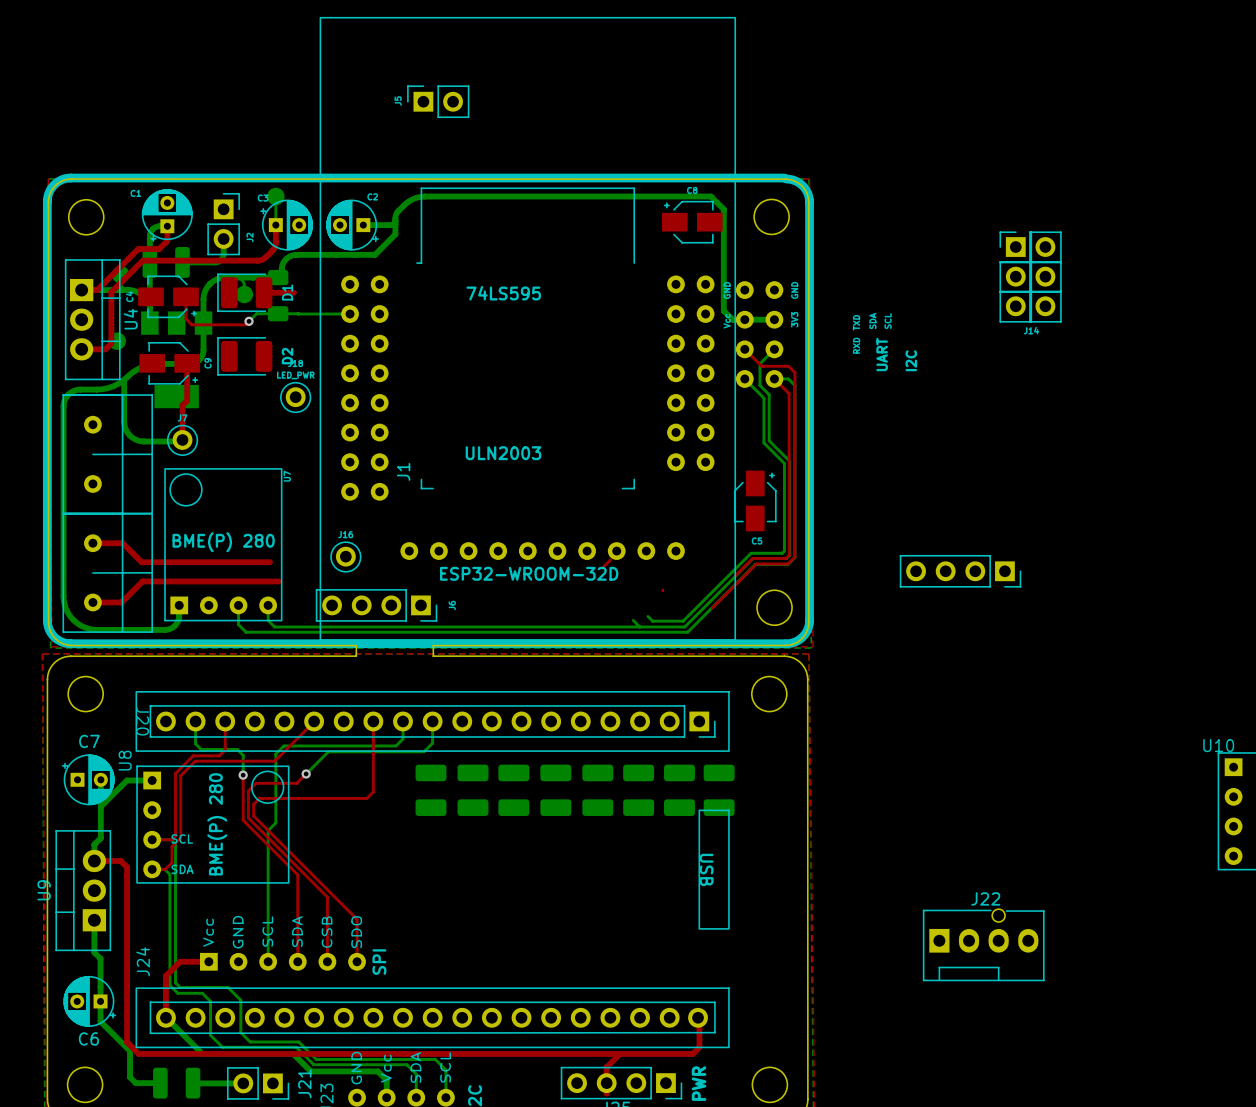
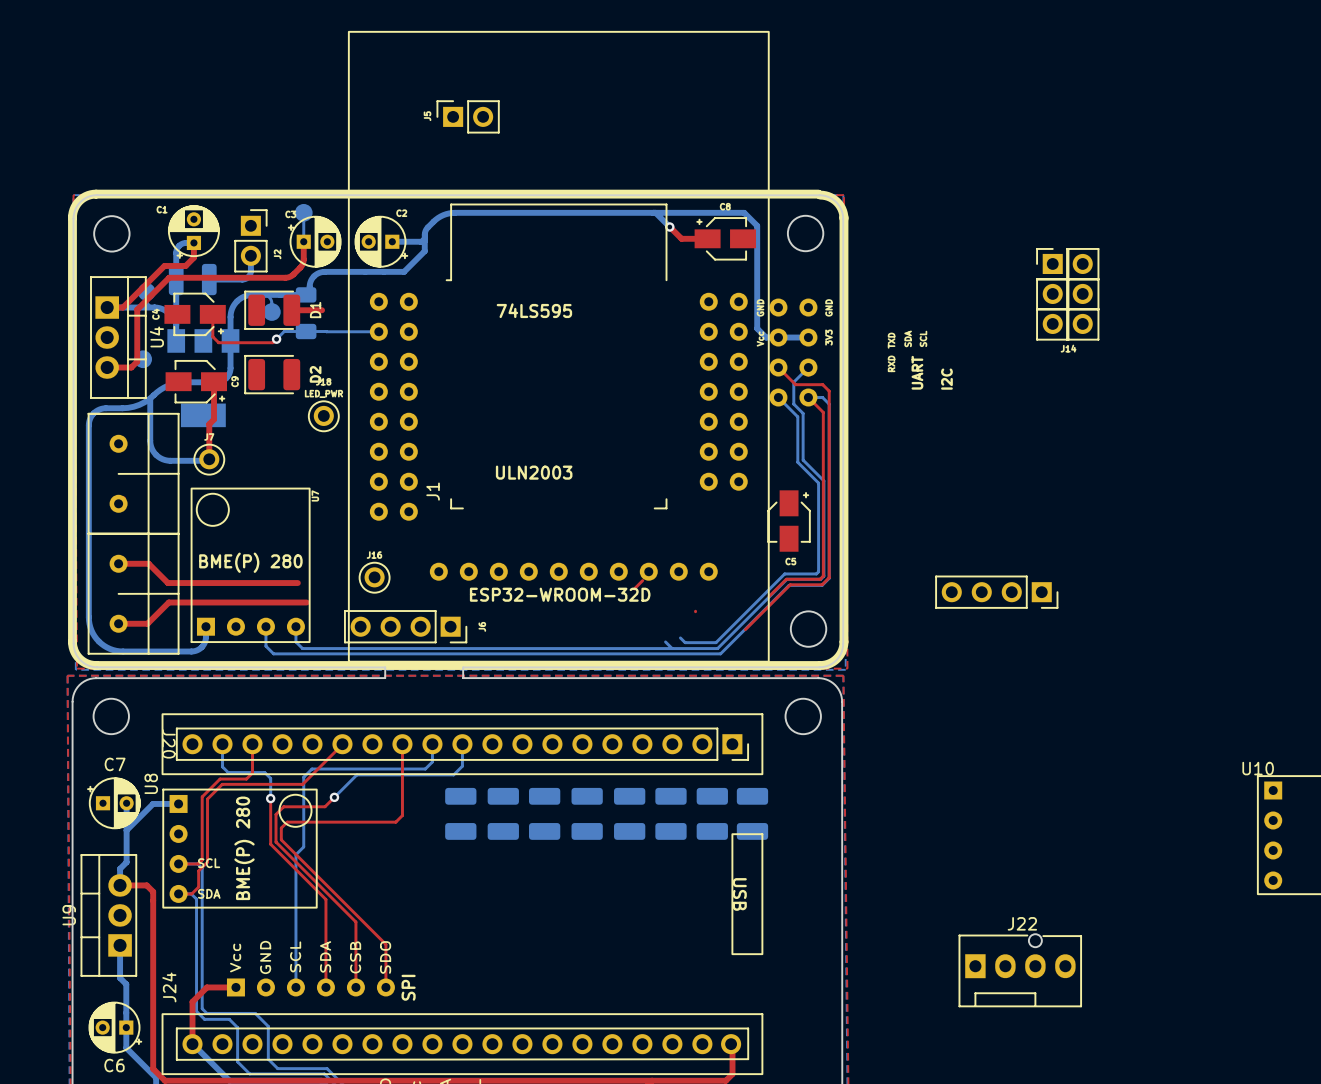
bottom track: none -> (655, 212) (669, 227)
top track: none -> (669, 227) (681, 238) (704, 238)
via: none -> (669, 227)

